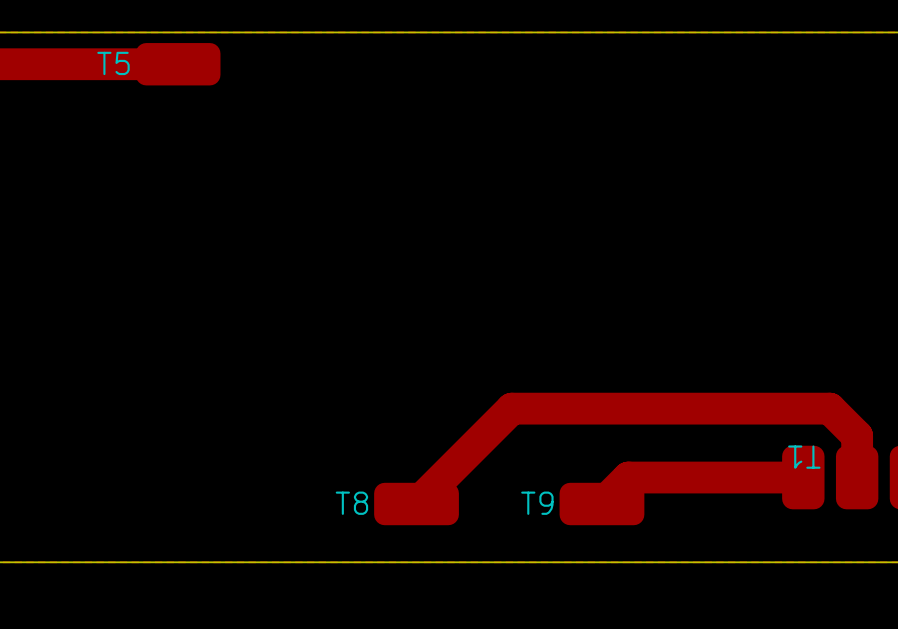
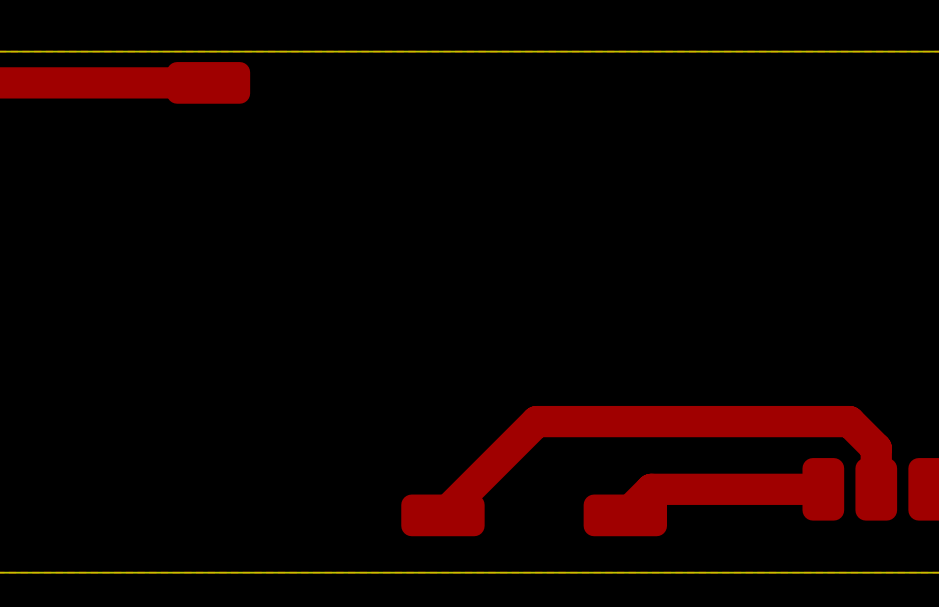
T5 name: T5 (113, 63) -> none
T1 name: T1 (804, 457) -> none
T8 name: T8 (351, 503) -> none
T9 name: T9 (537, 503) -> none

